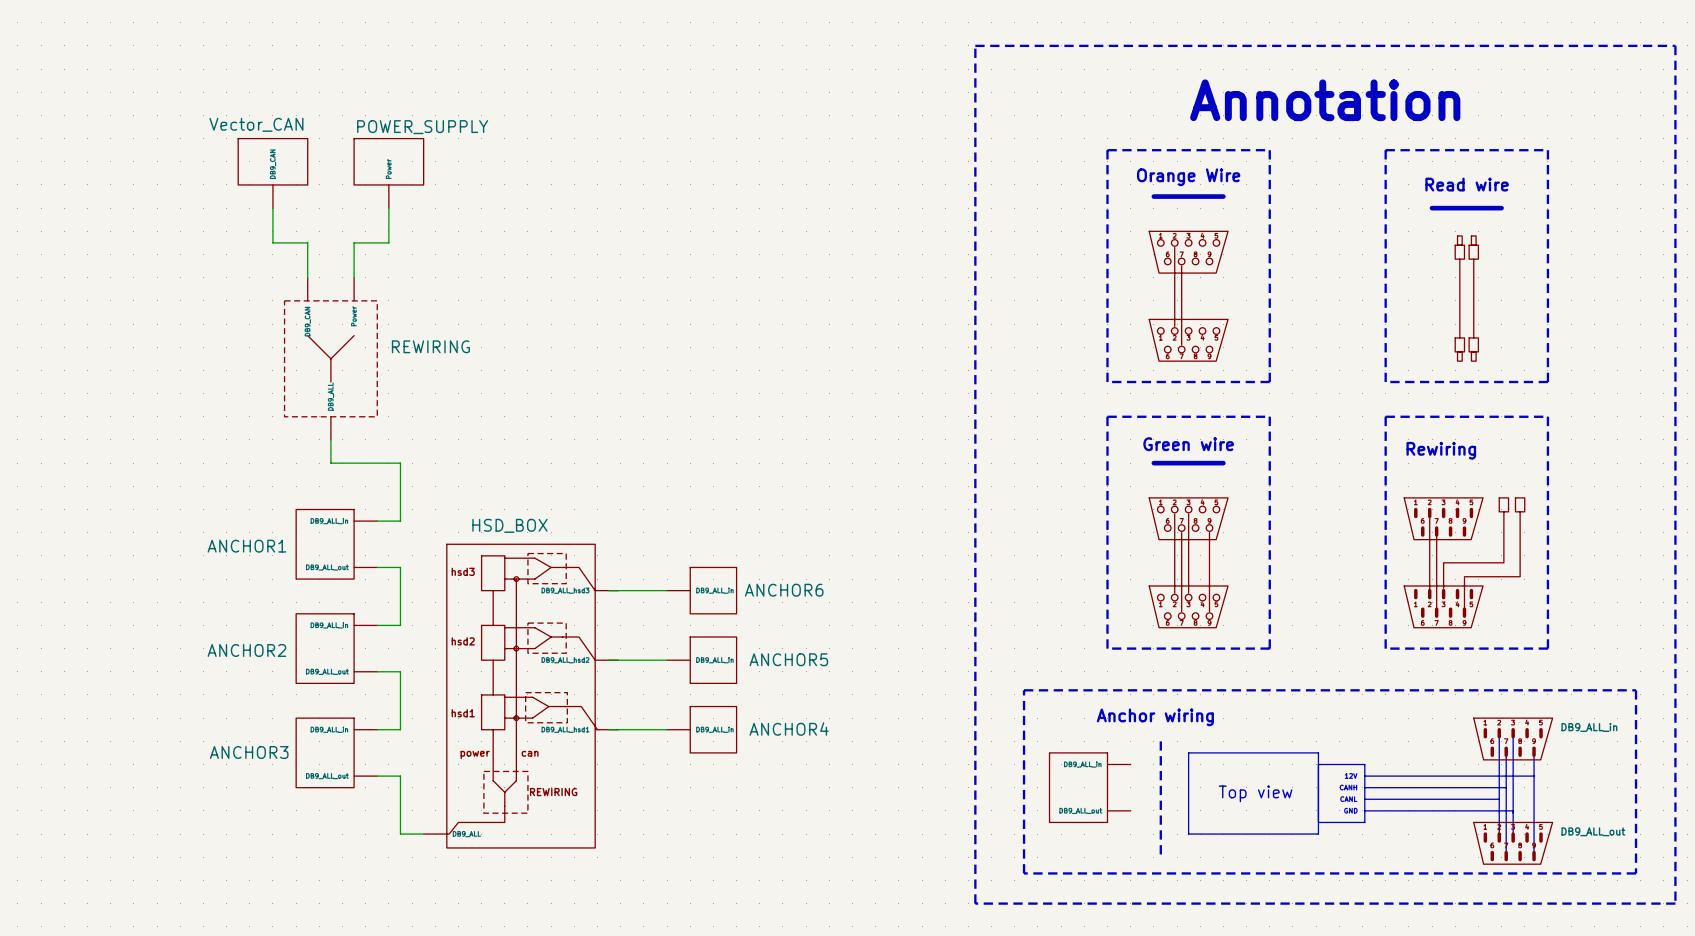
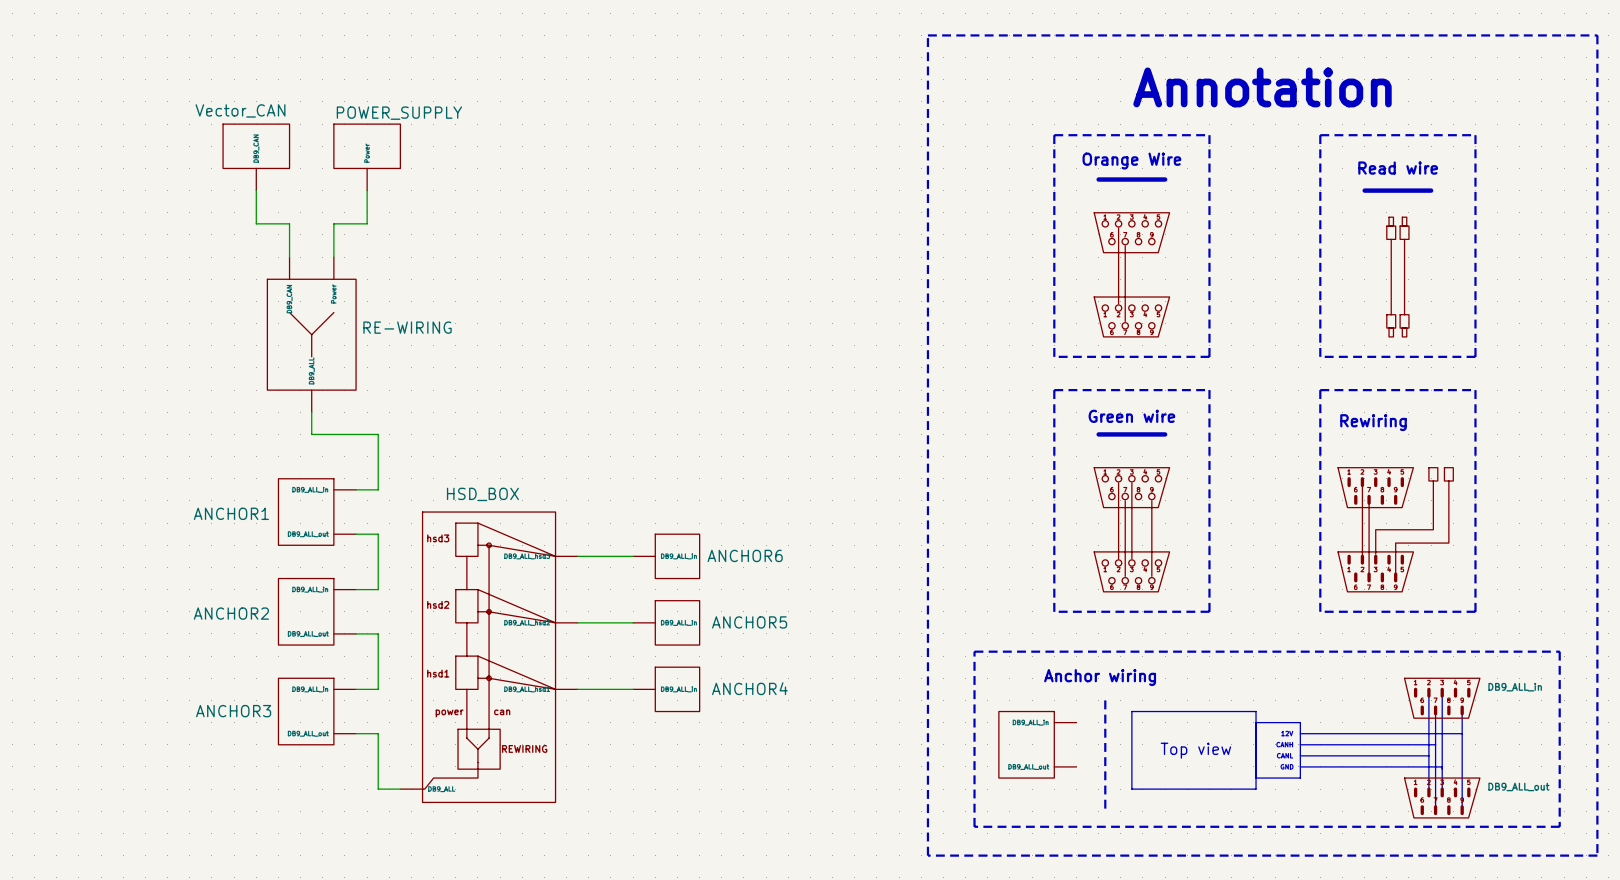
REWIRING: (330, 358) -> none
RE-WIRING: none -> (311, 334)
HSD_BOX symbol: [423, 544, 619, 848] -> [400, 512, 578, 803]

